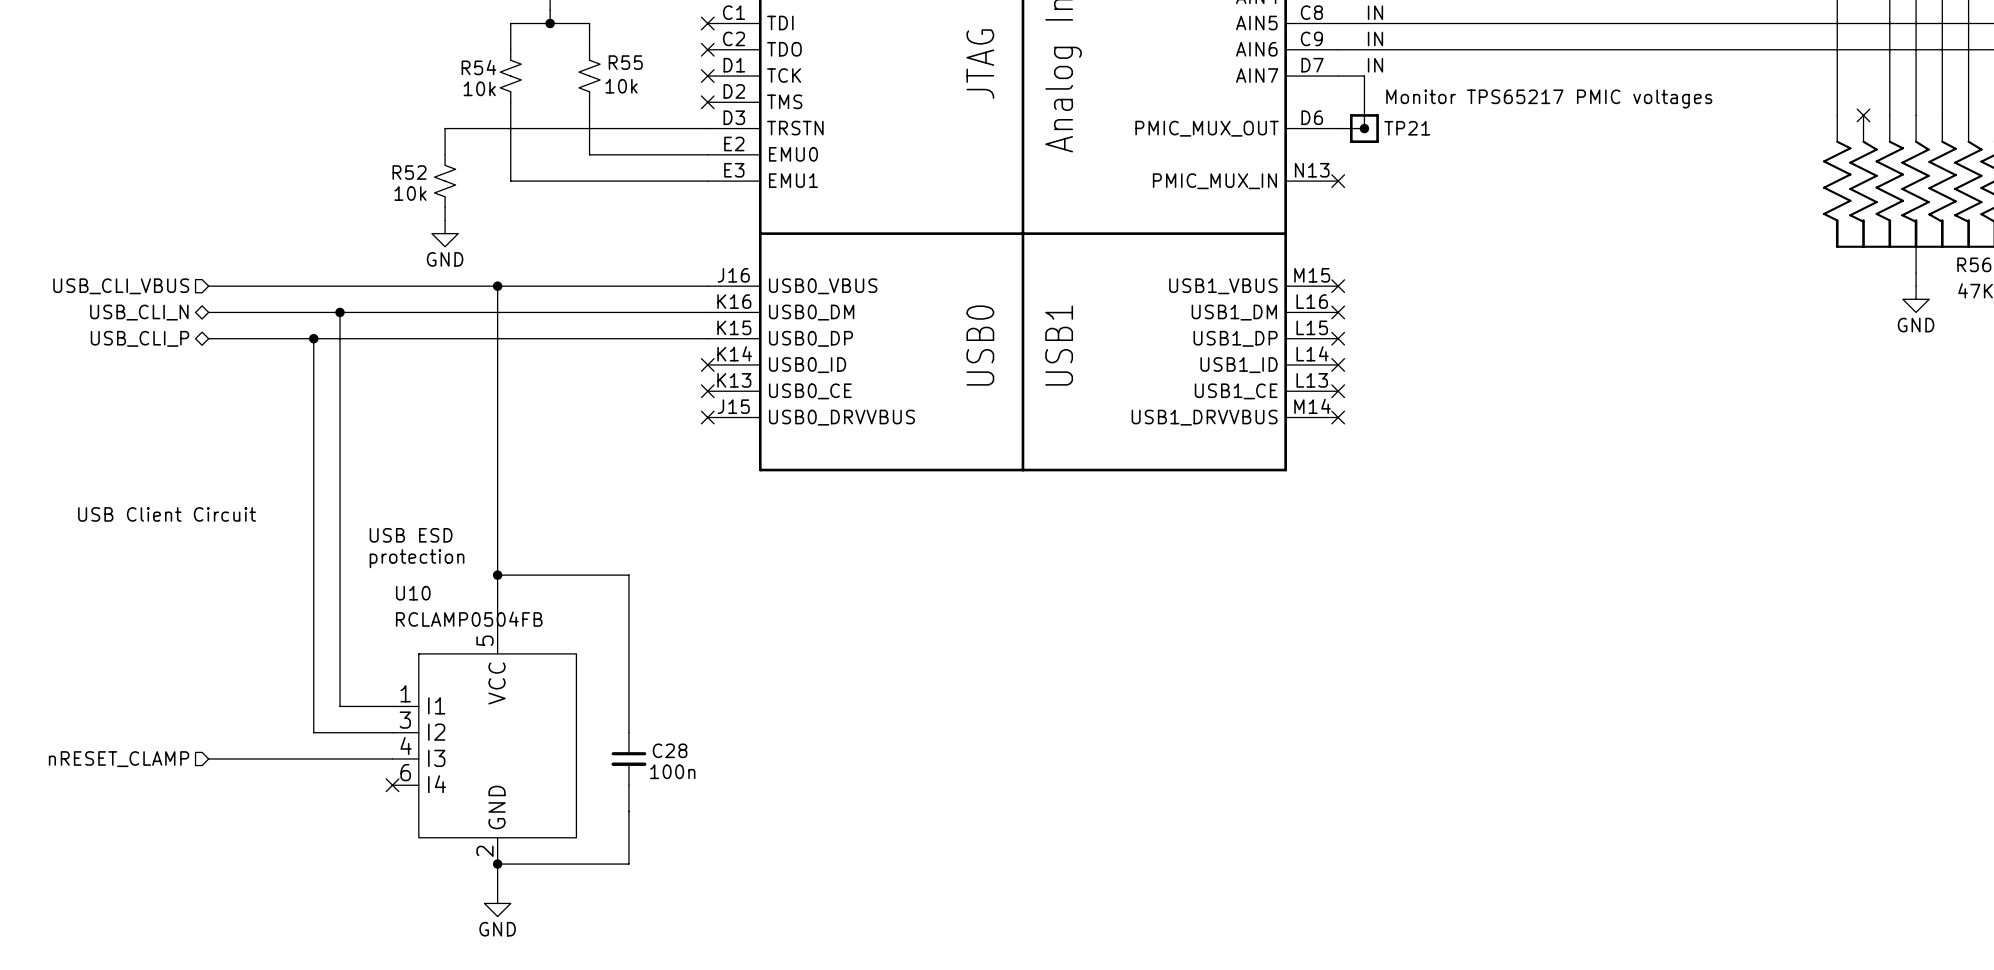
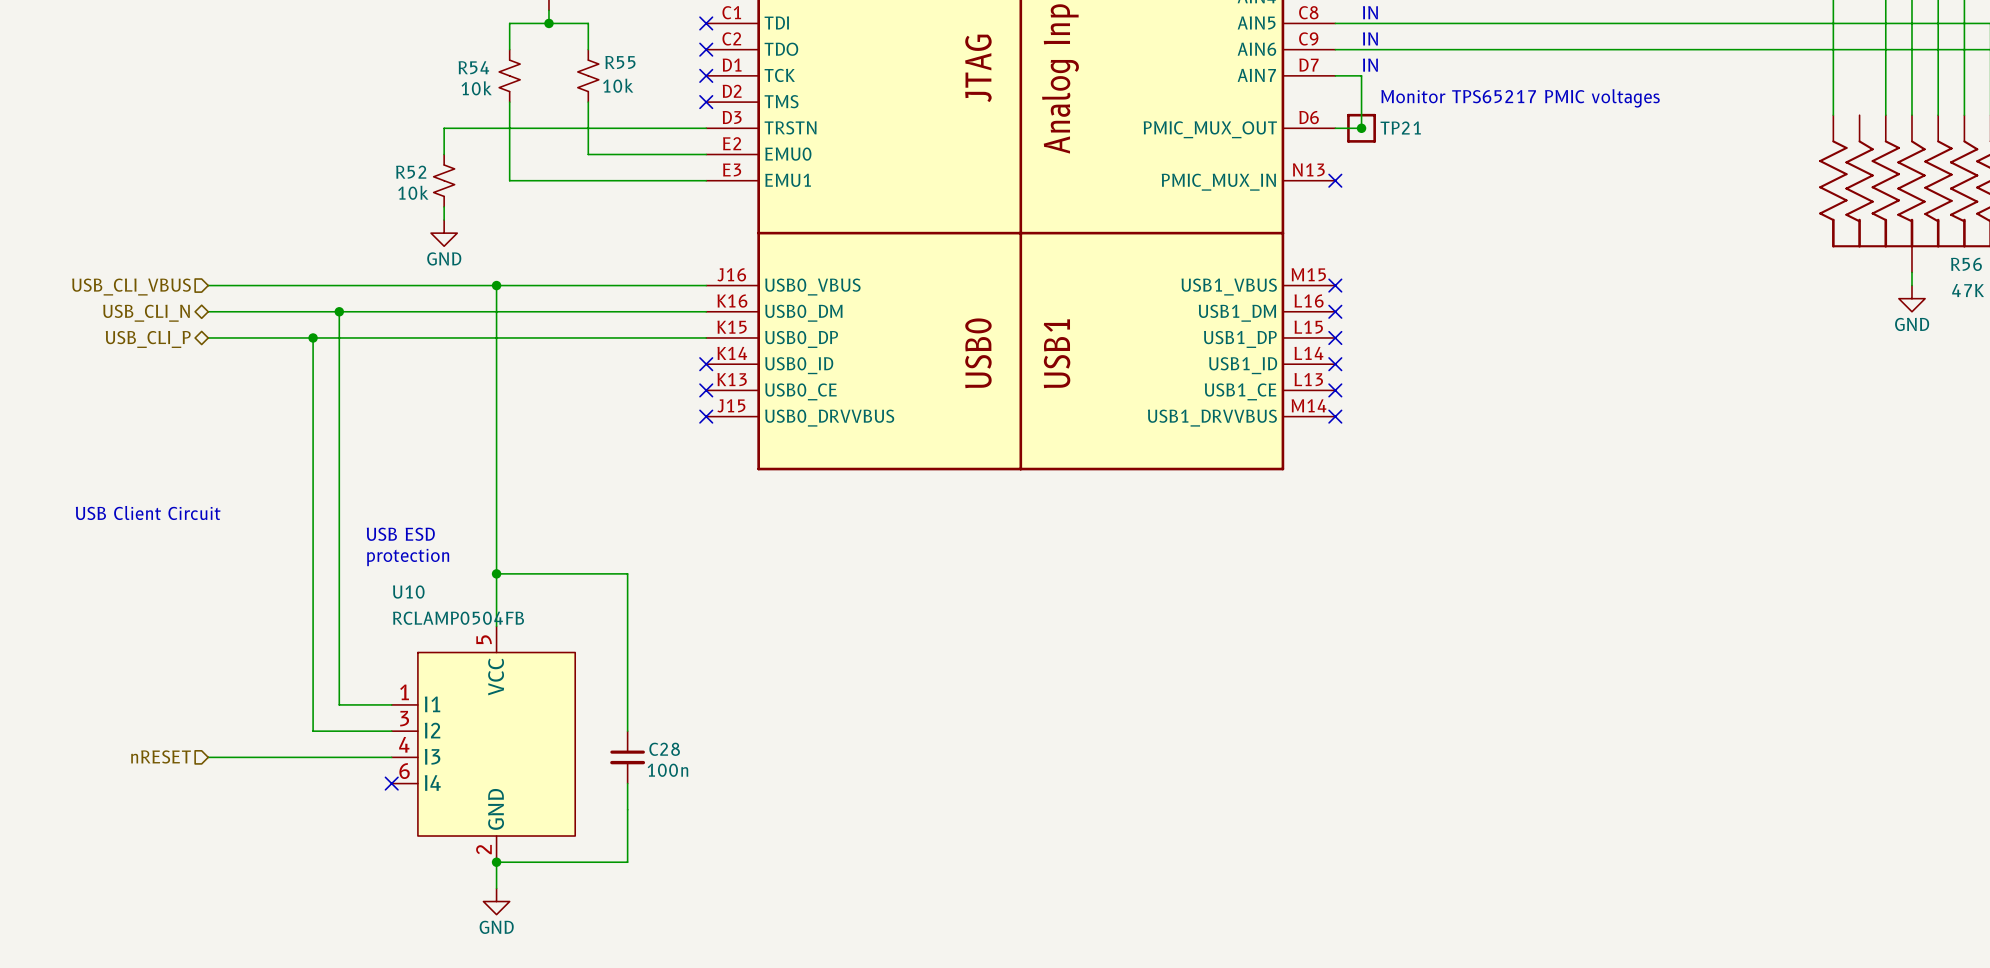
no-connect mark: (1863, 115) -> none
hierarchical label: nRESET_CLAMP (119, 759) -> nRESET (161, 756)

